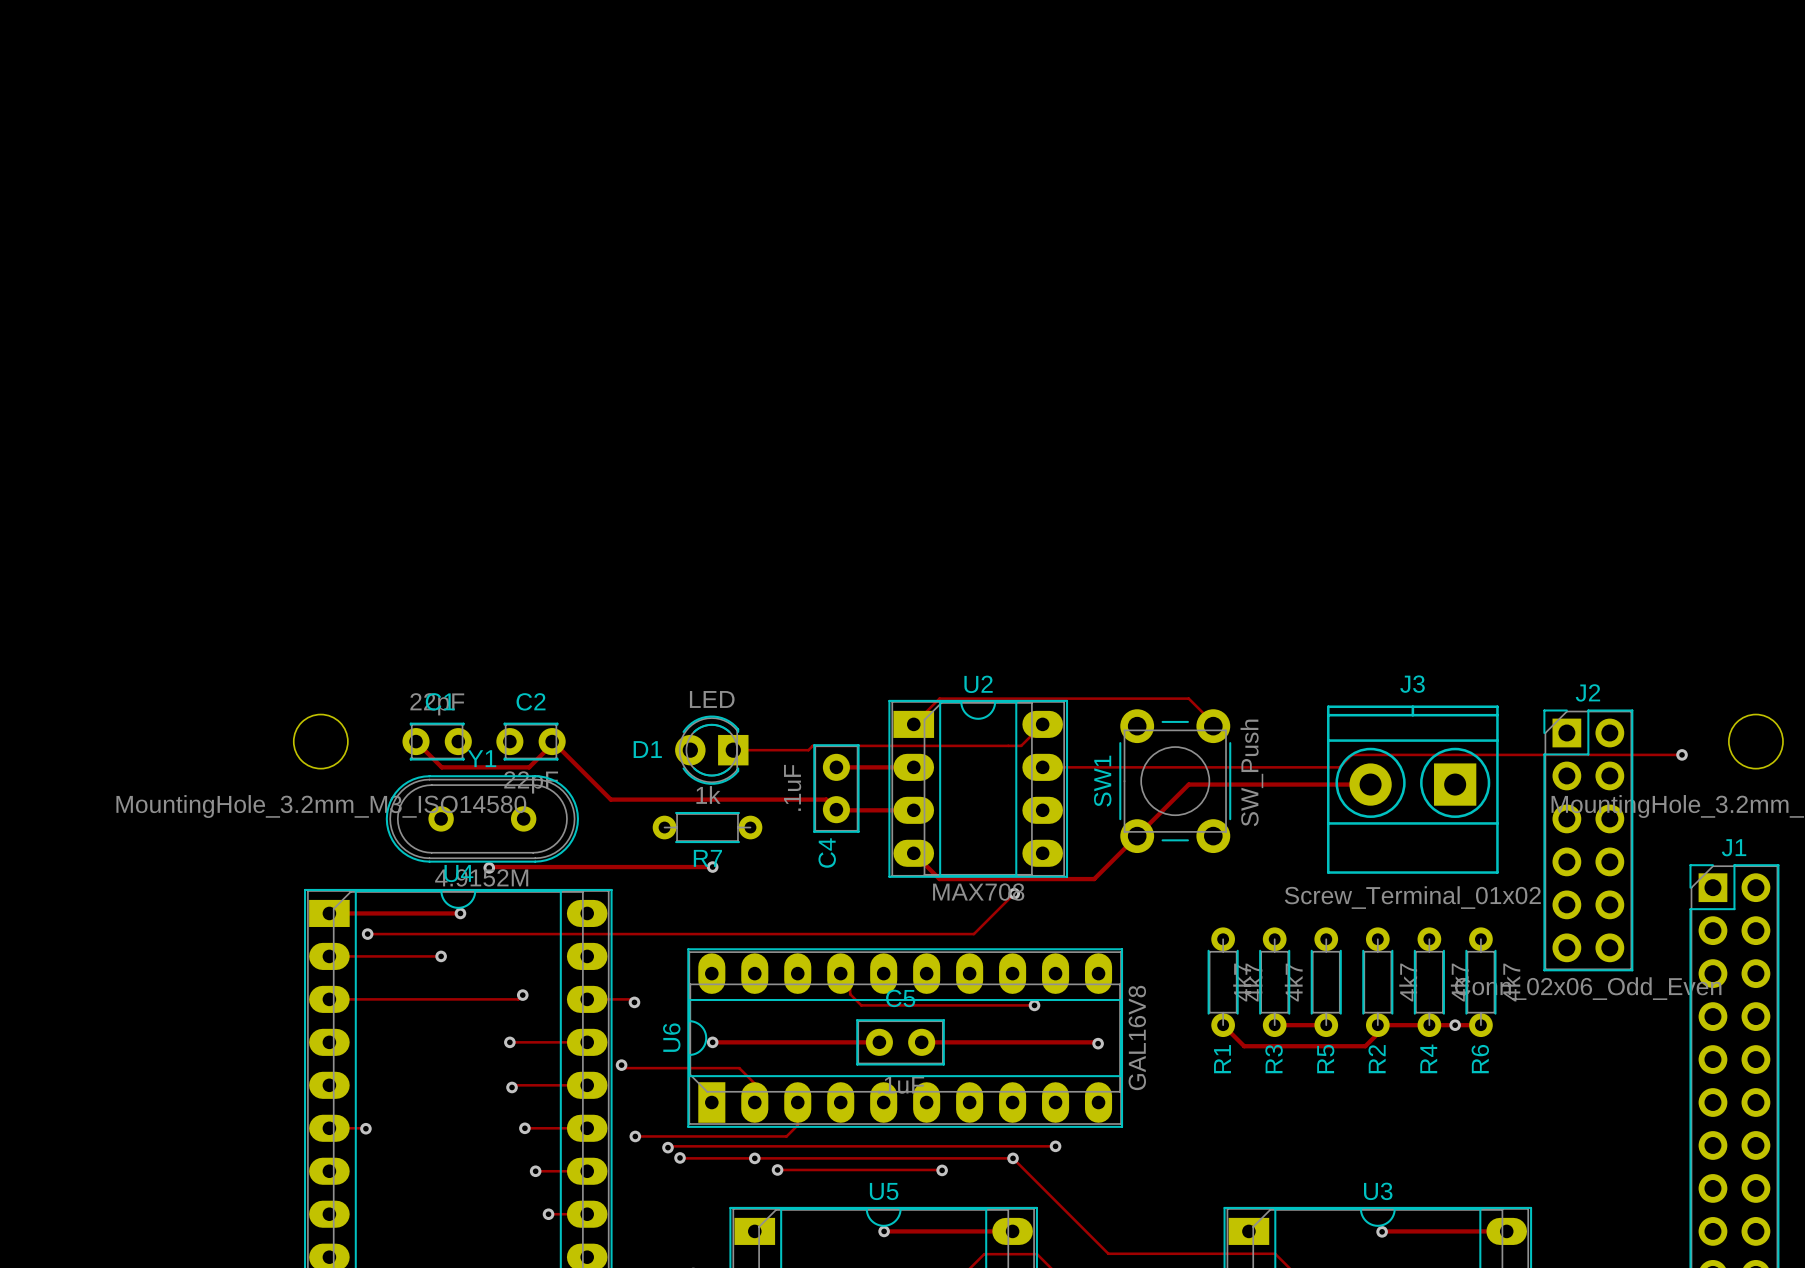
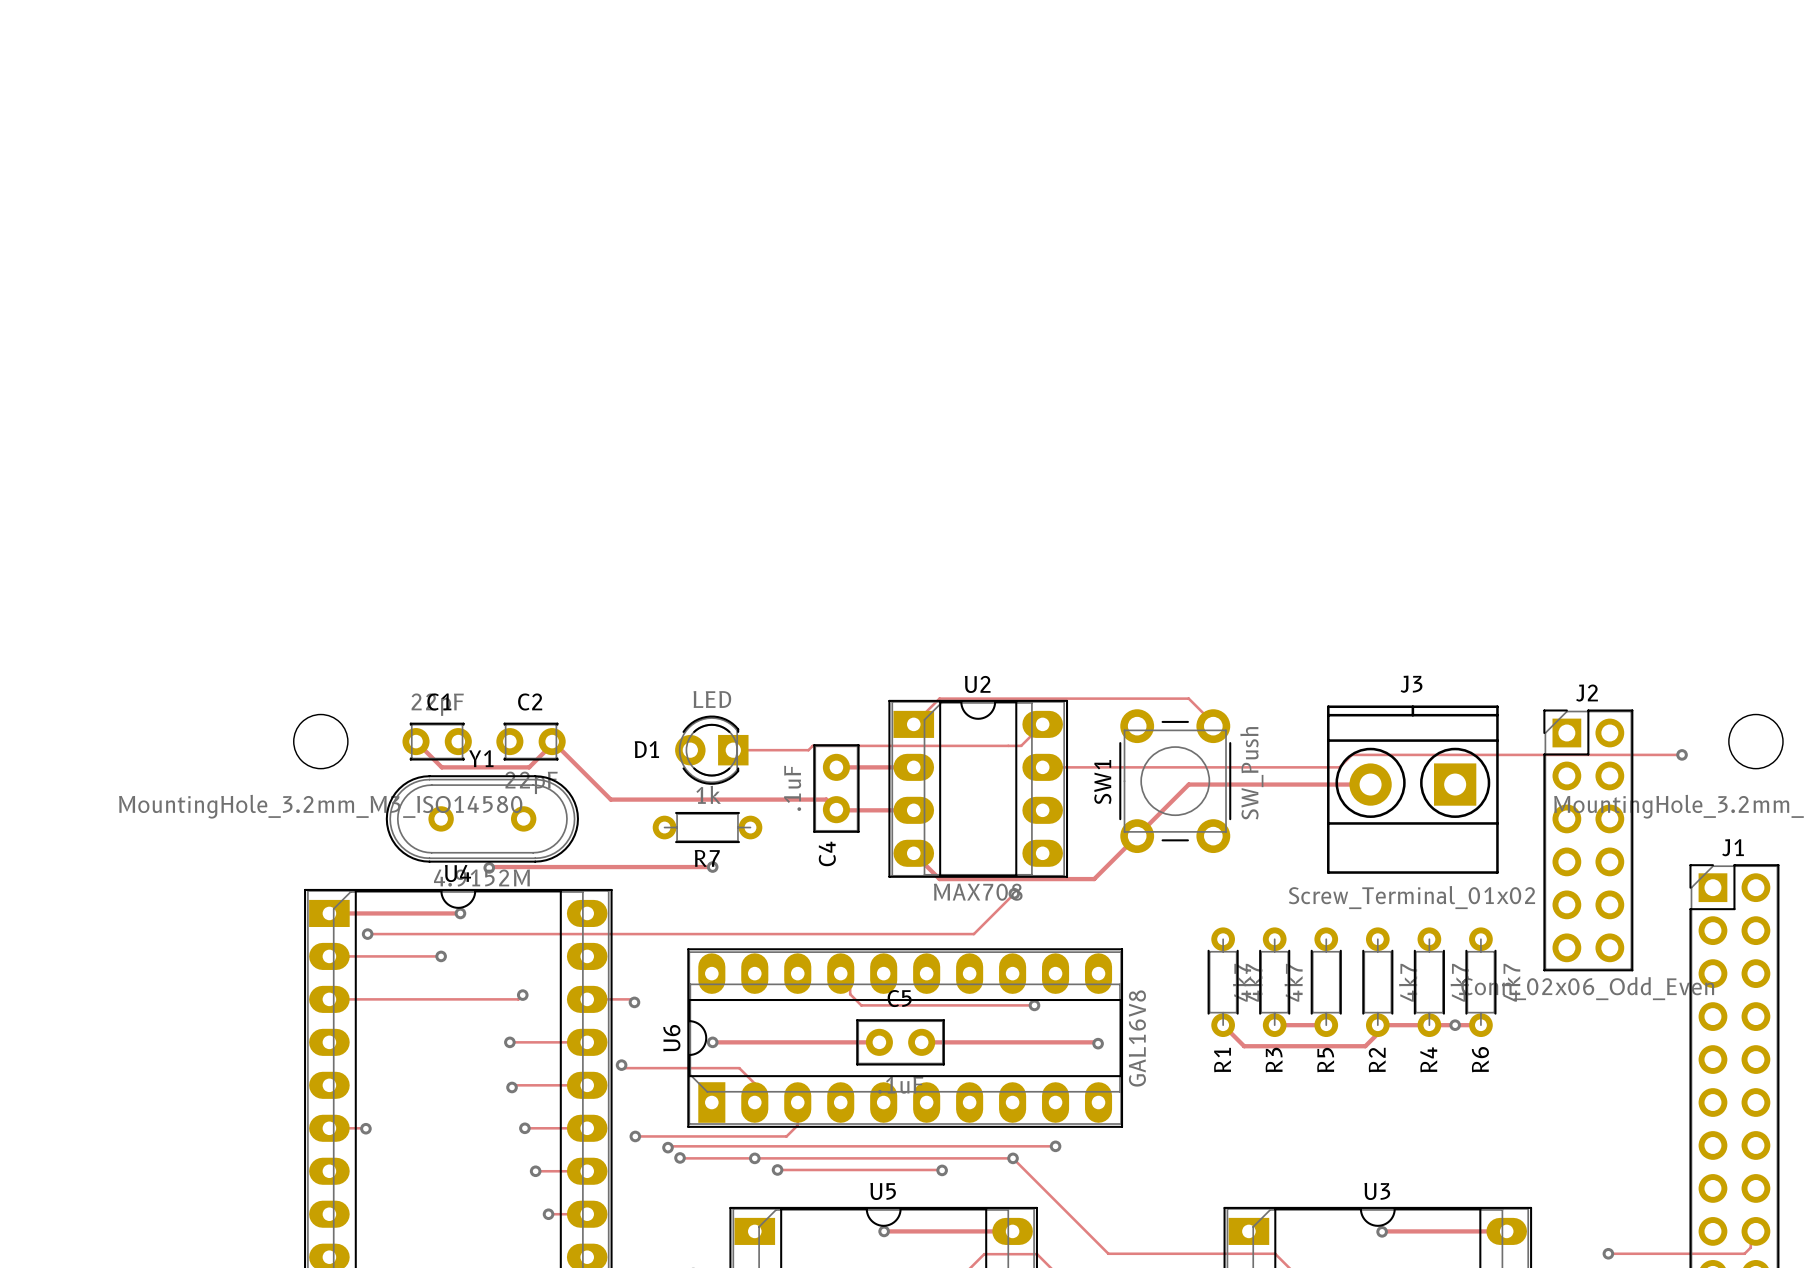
track: none -> (1755, 1231) (1750, 1236) (1750, 1247) (1744, 1253) (1608, 1253)
via: none -> (1608, 1253)

